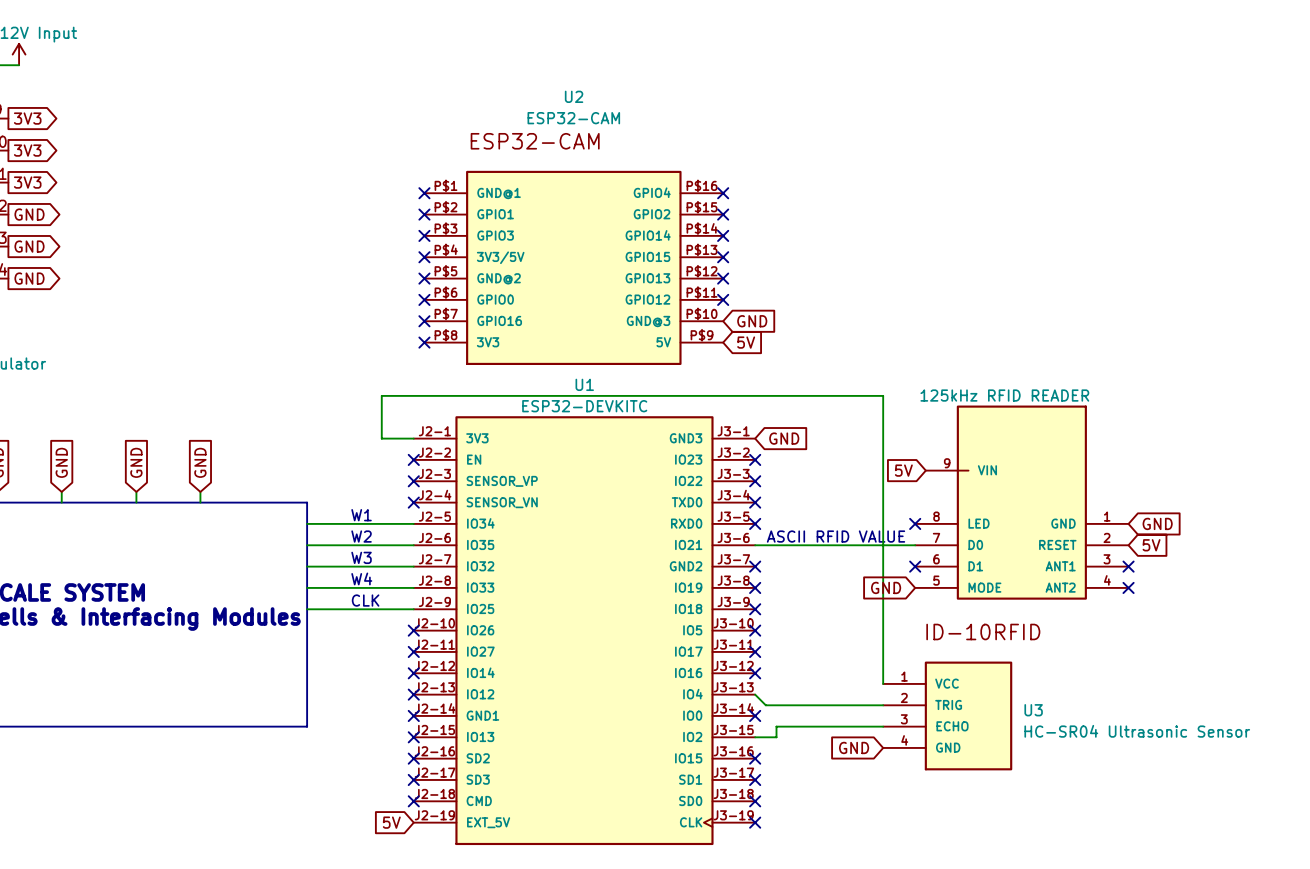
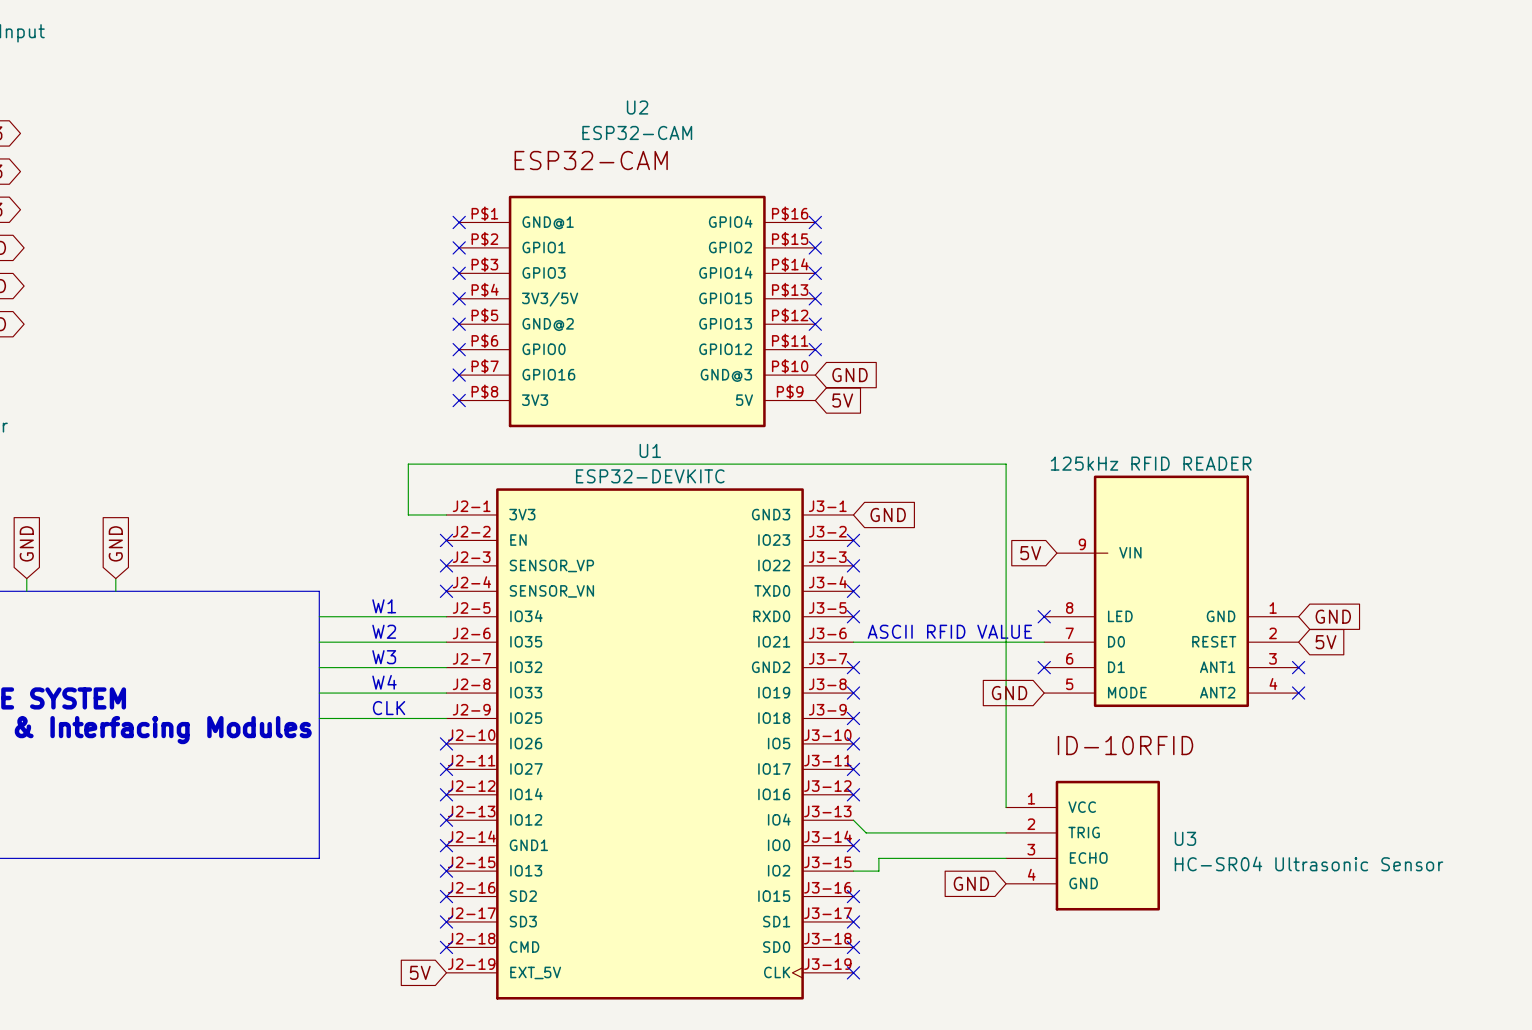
global label: GND (200, 462) -> none
wire: (200, 491) (200, 502) -> none

